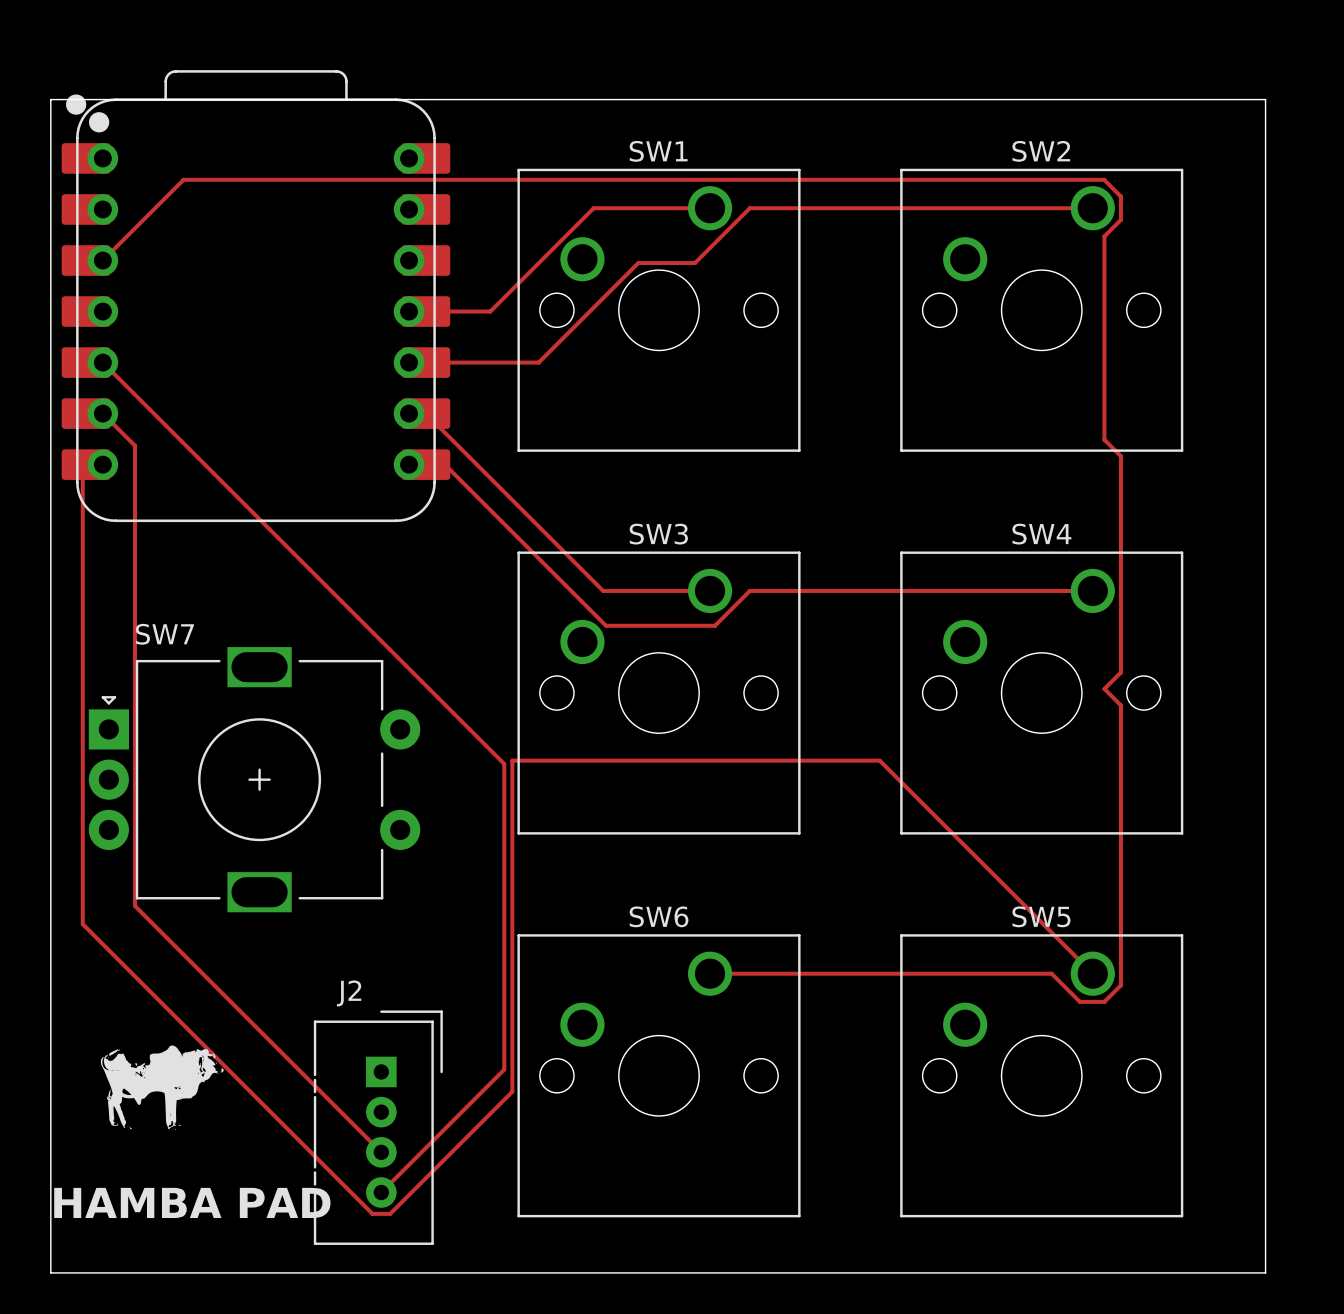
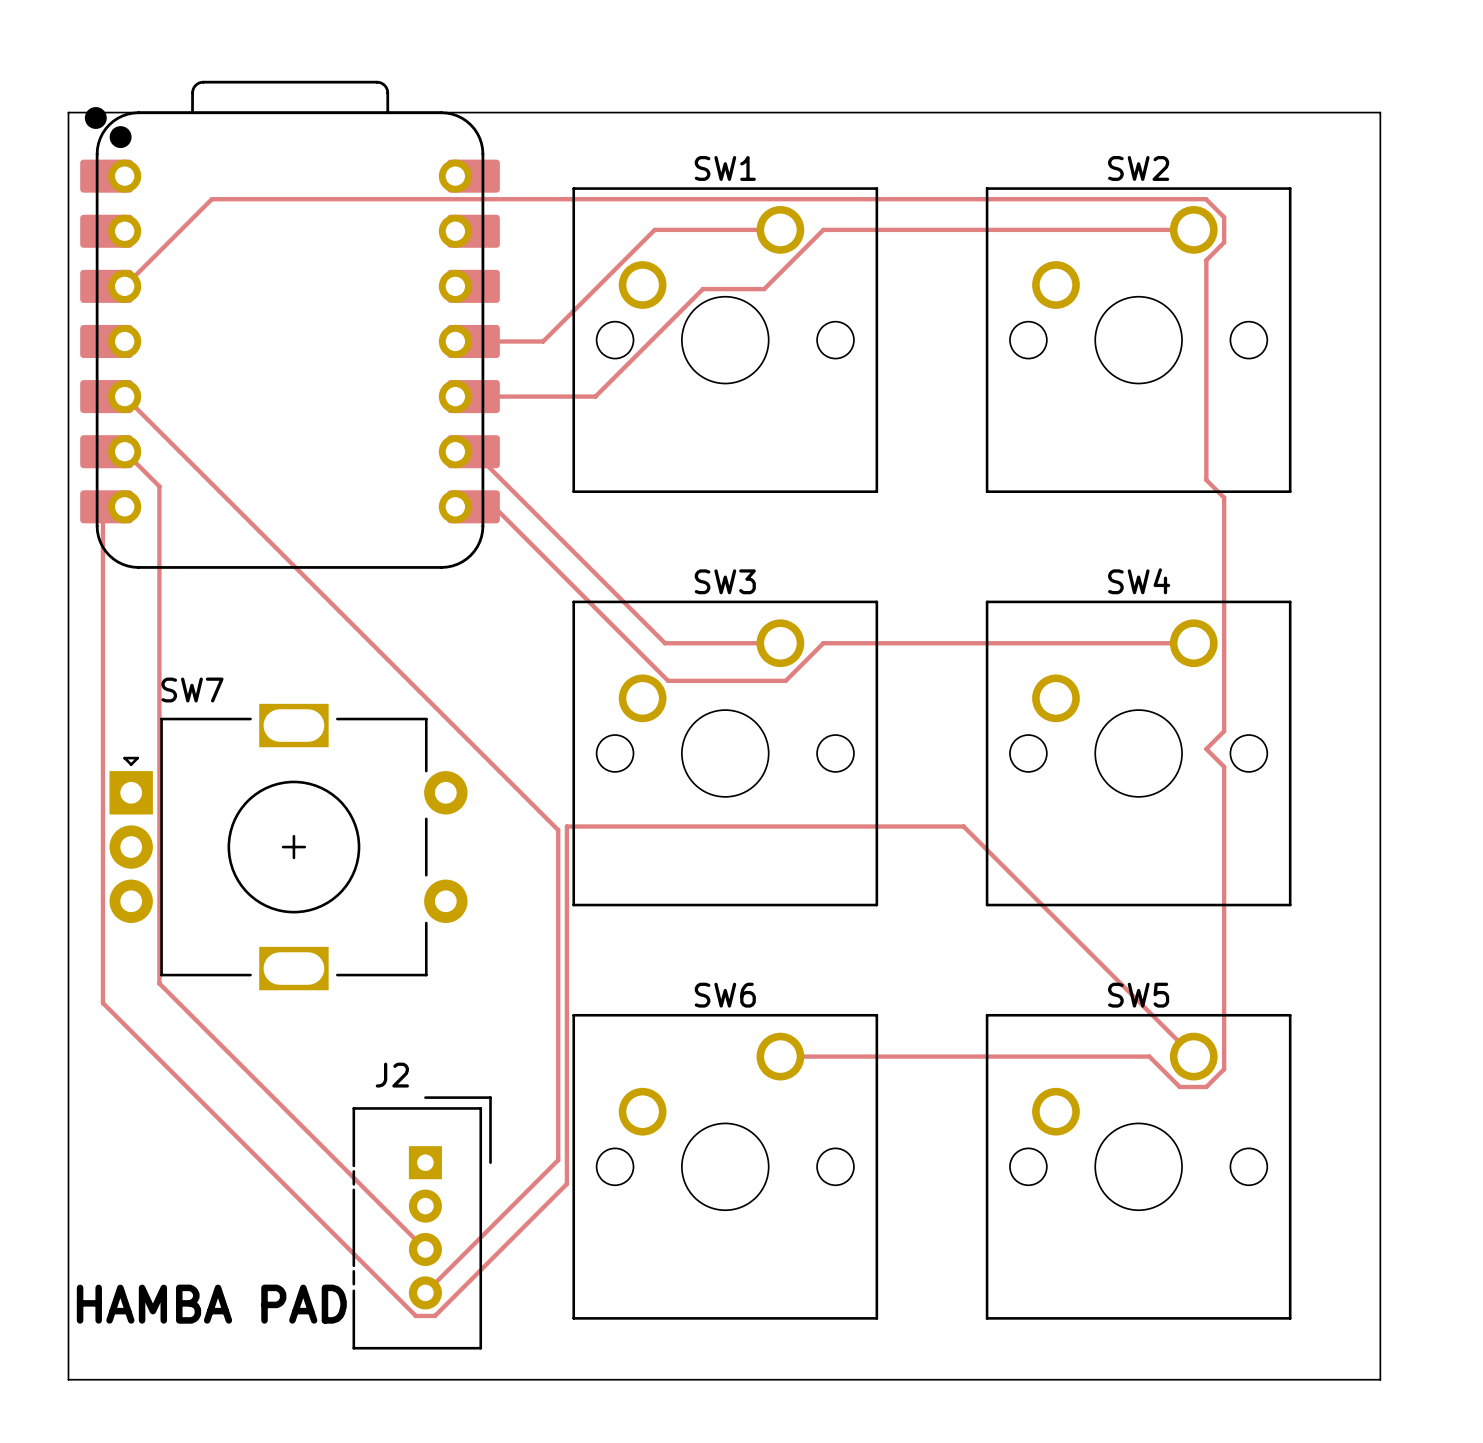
part: (162, 1087) -> none

